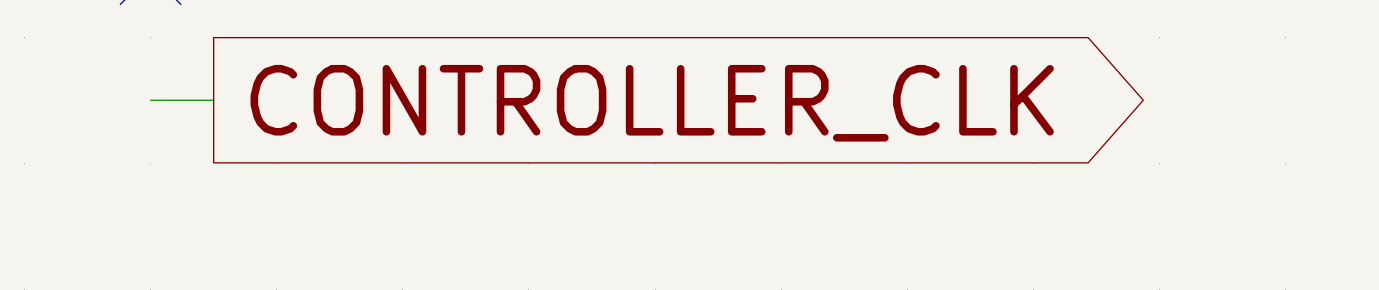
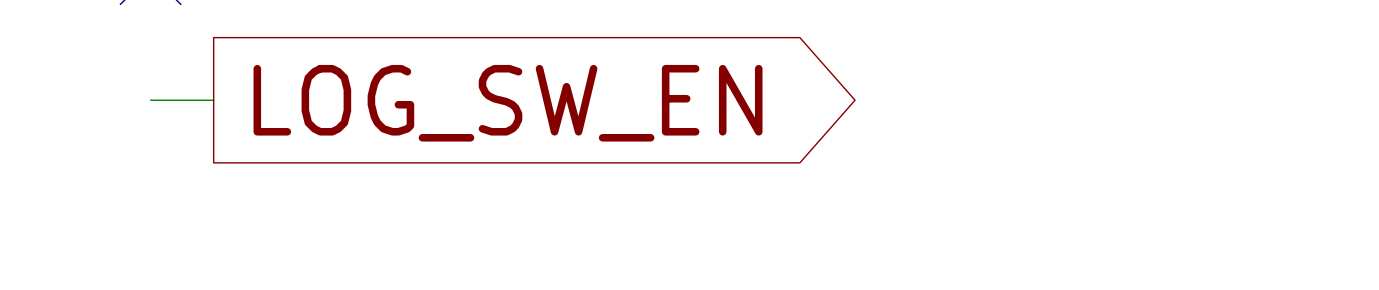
global label: CONTROLLER_CLK (652, 103) -> LOG_SW_EN (508, 103)

